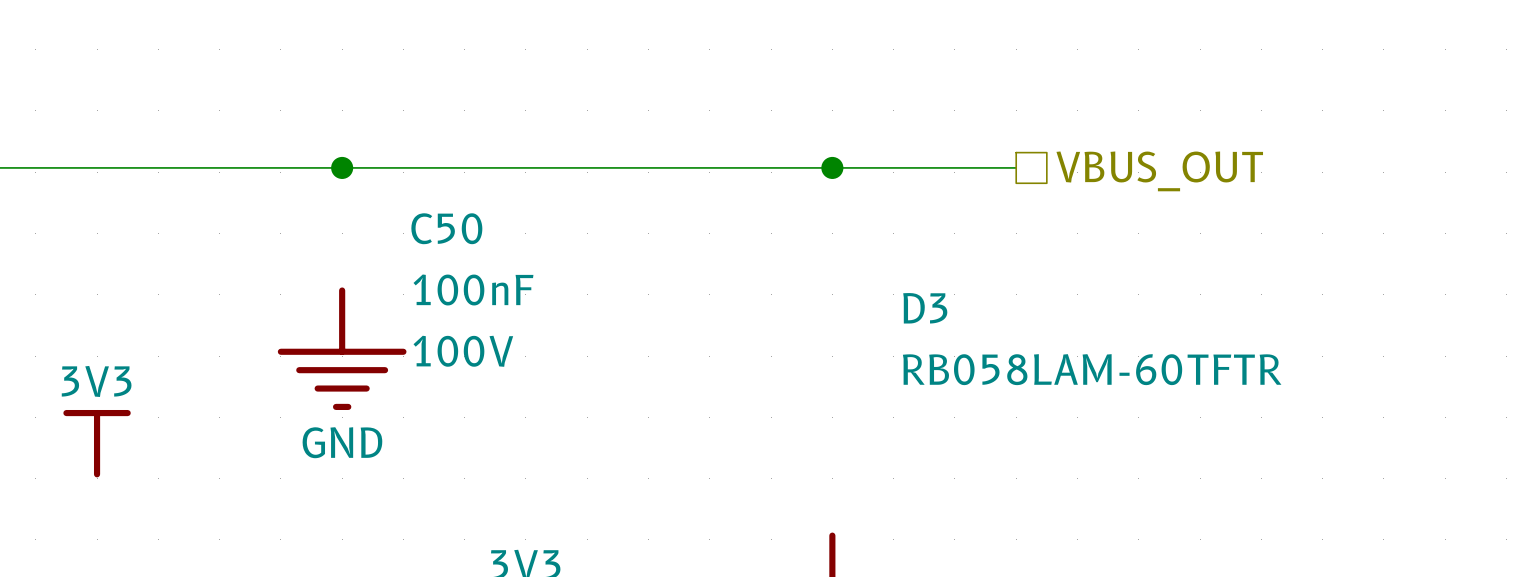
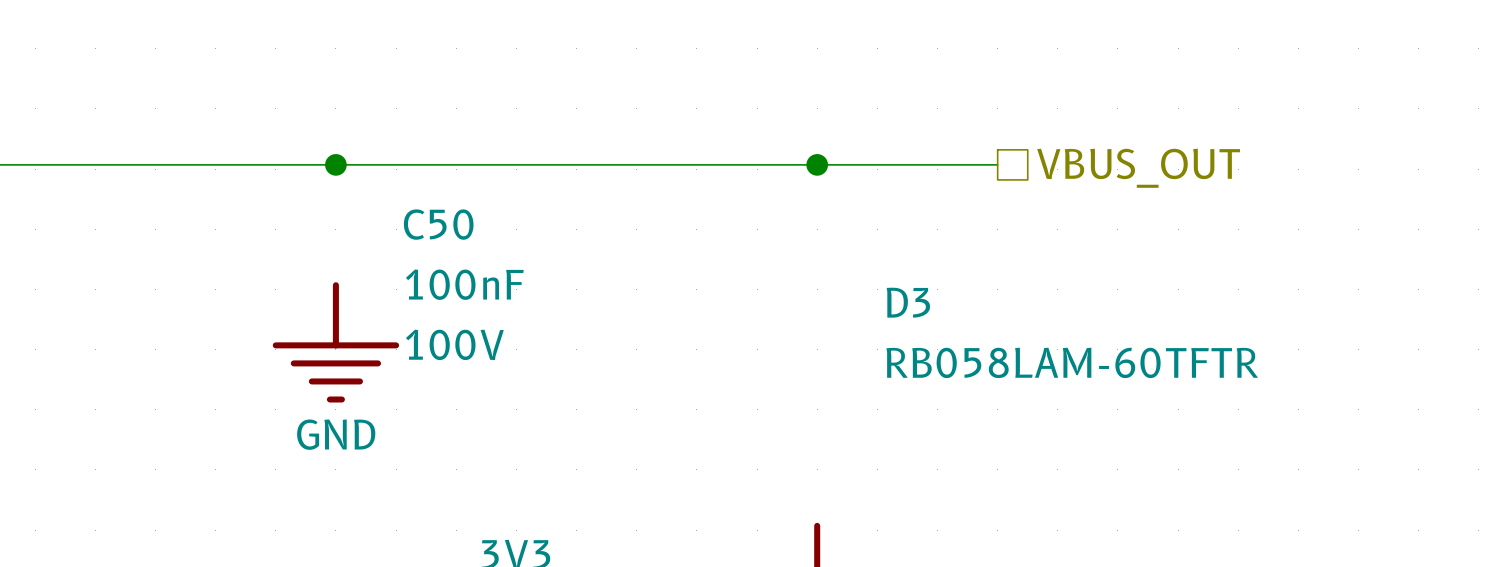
power symbol: 3V3 (97, 443) -> none

